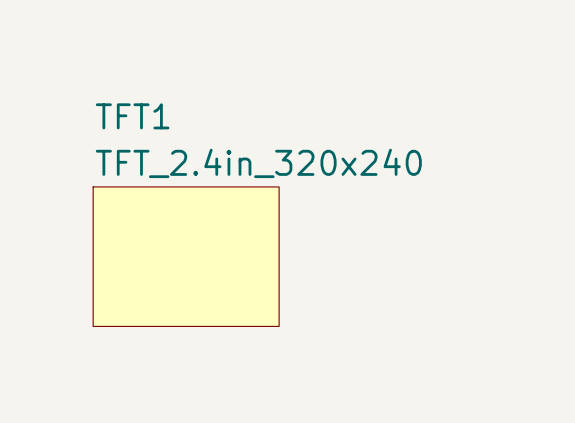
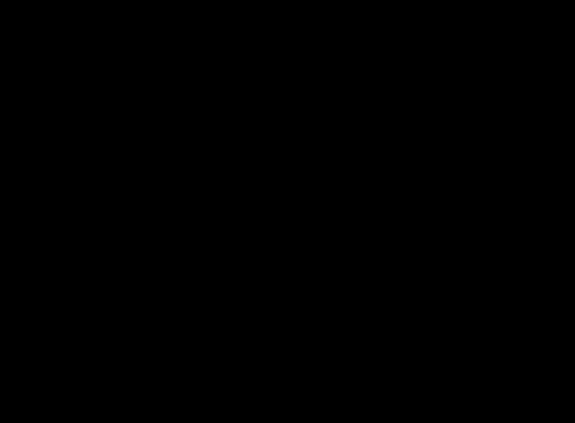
TFT1: TFT_2.4in_320x240 (186, 256) -> none

